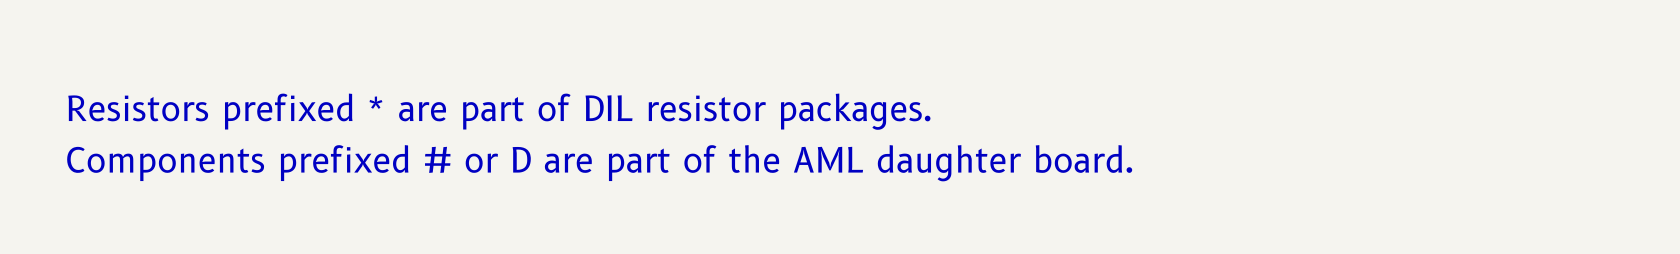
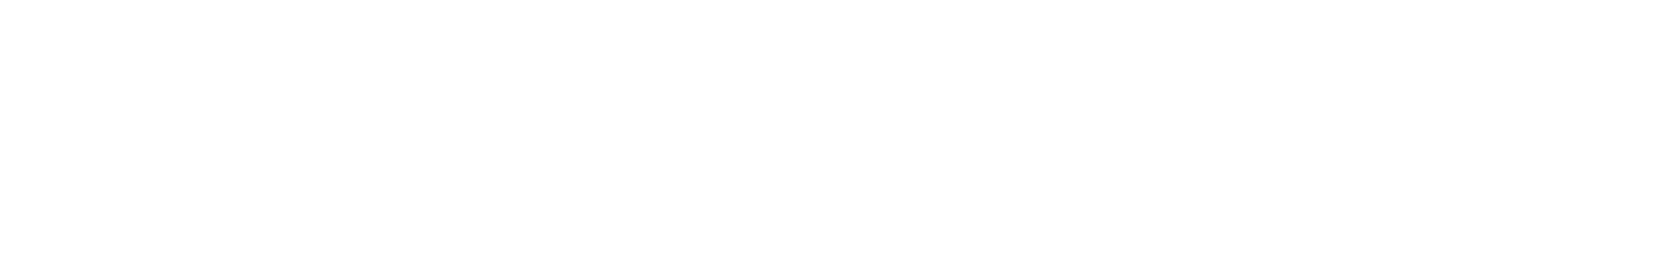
text: Resistors prefixed * are part of DIL resistor packages. (499, 111) -> none
text: Components prefixed # or D are part of the AML daughter board. (599, 163) -> none

